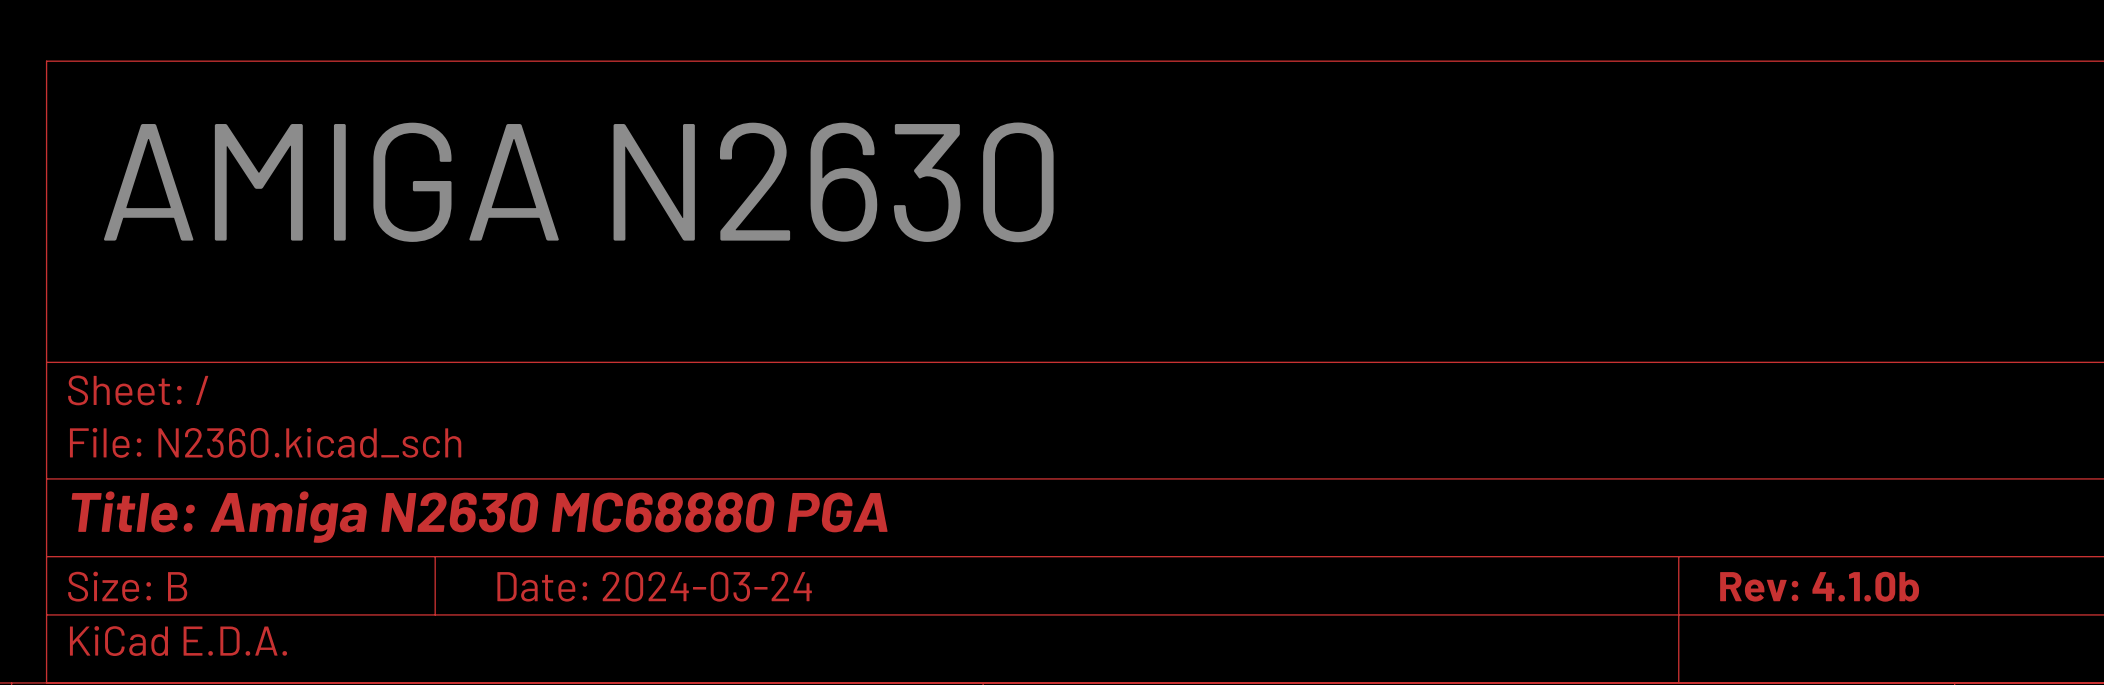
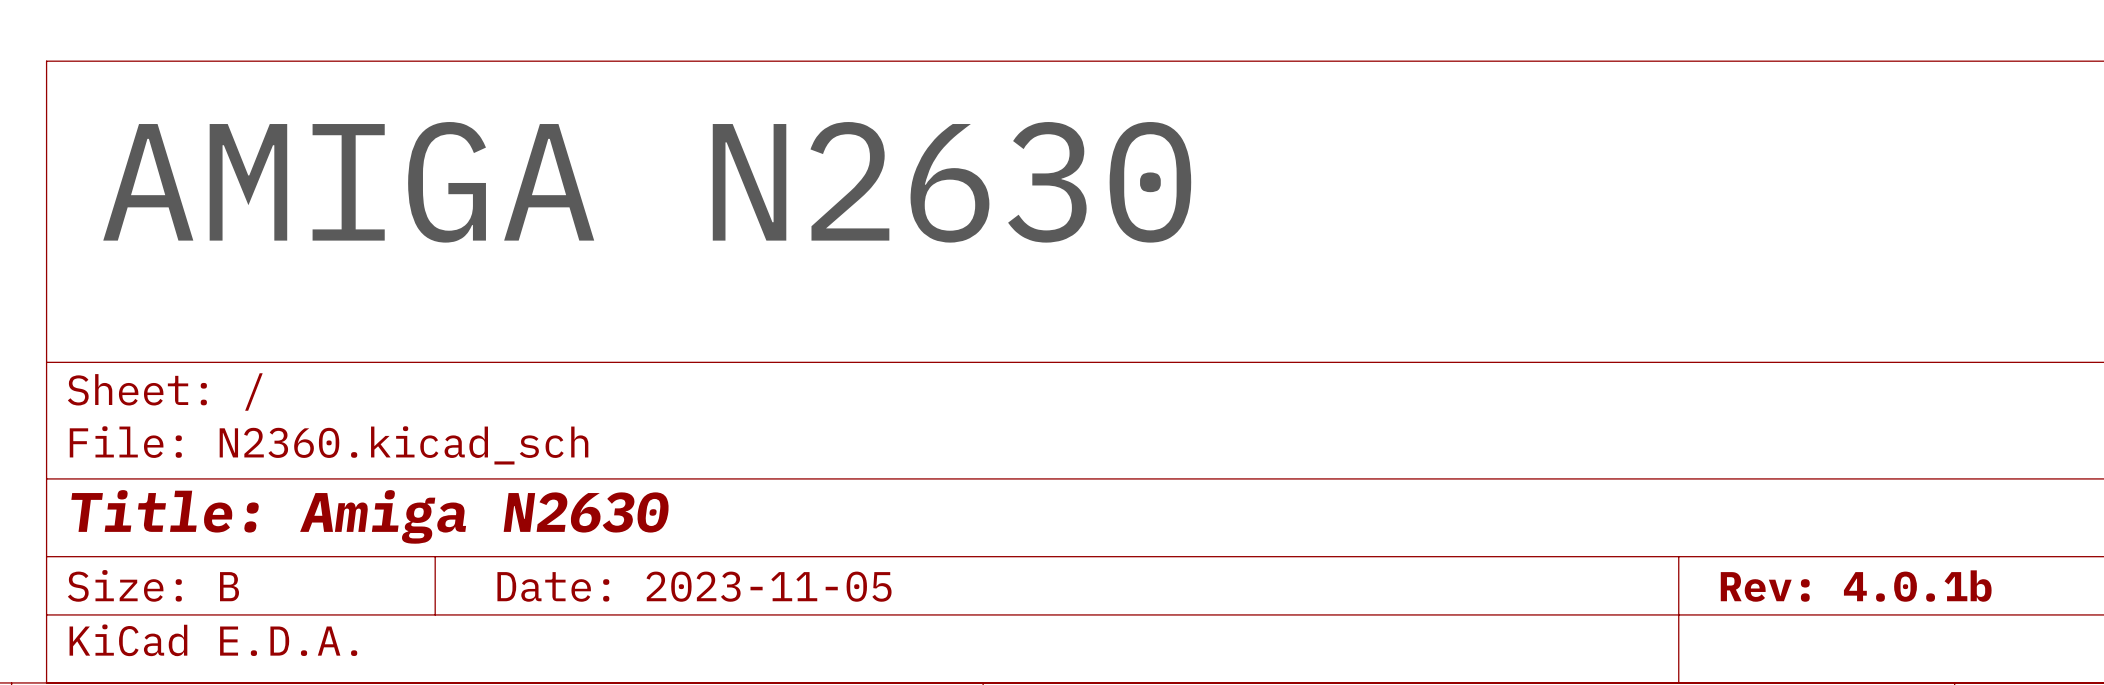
title block: Title: Amiga N2630 MC68880 PGA (479, 517) -> Title: Amiga N2630 (370, 516)
title block: Date: 2024-03-24 (654, 586) -> Date: 2023-11-05 (694, 586)
title block: Rev: 4.1.0b (1819, 586) -> Rev: 4.0.1b (1856, 586)

